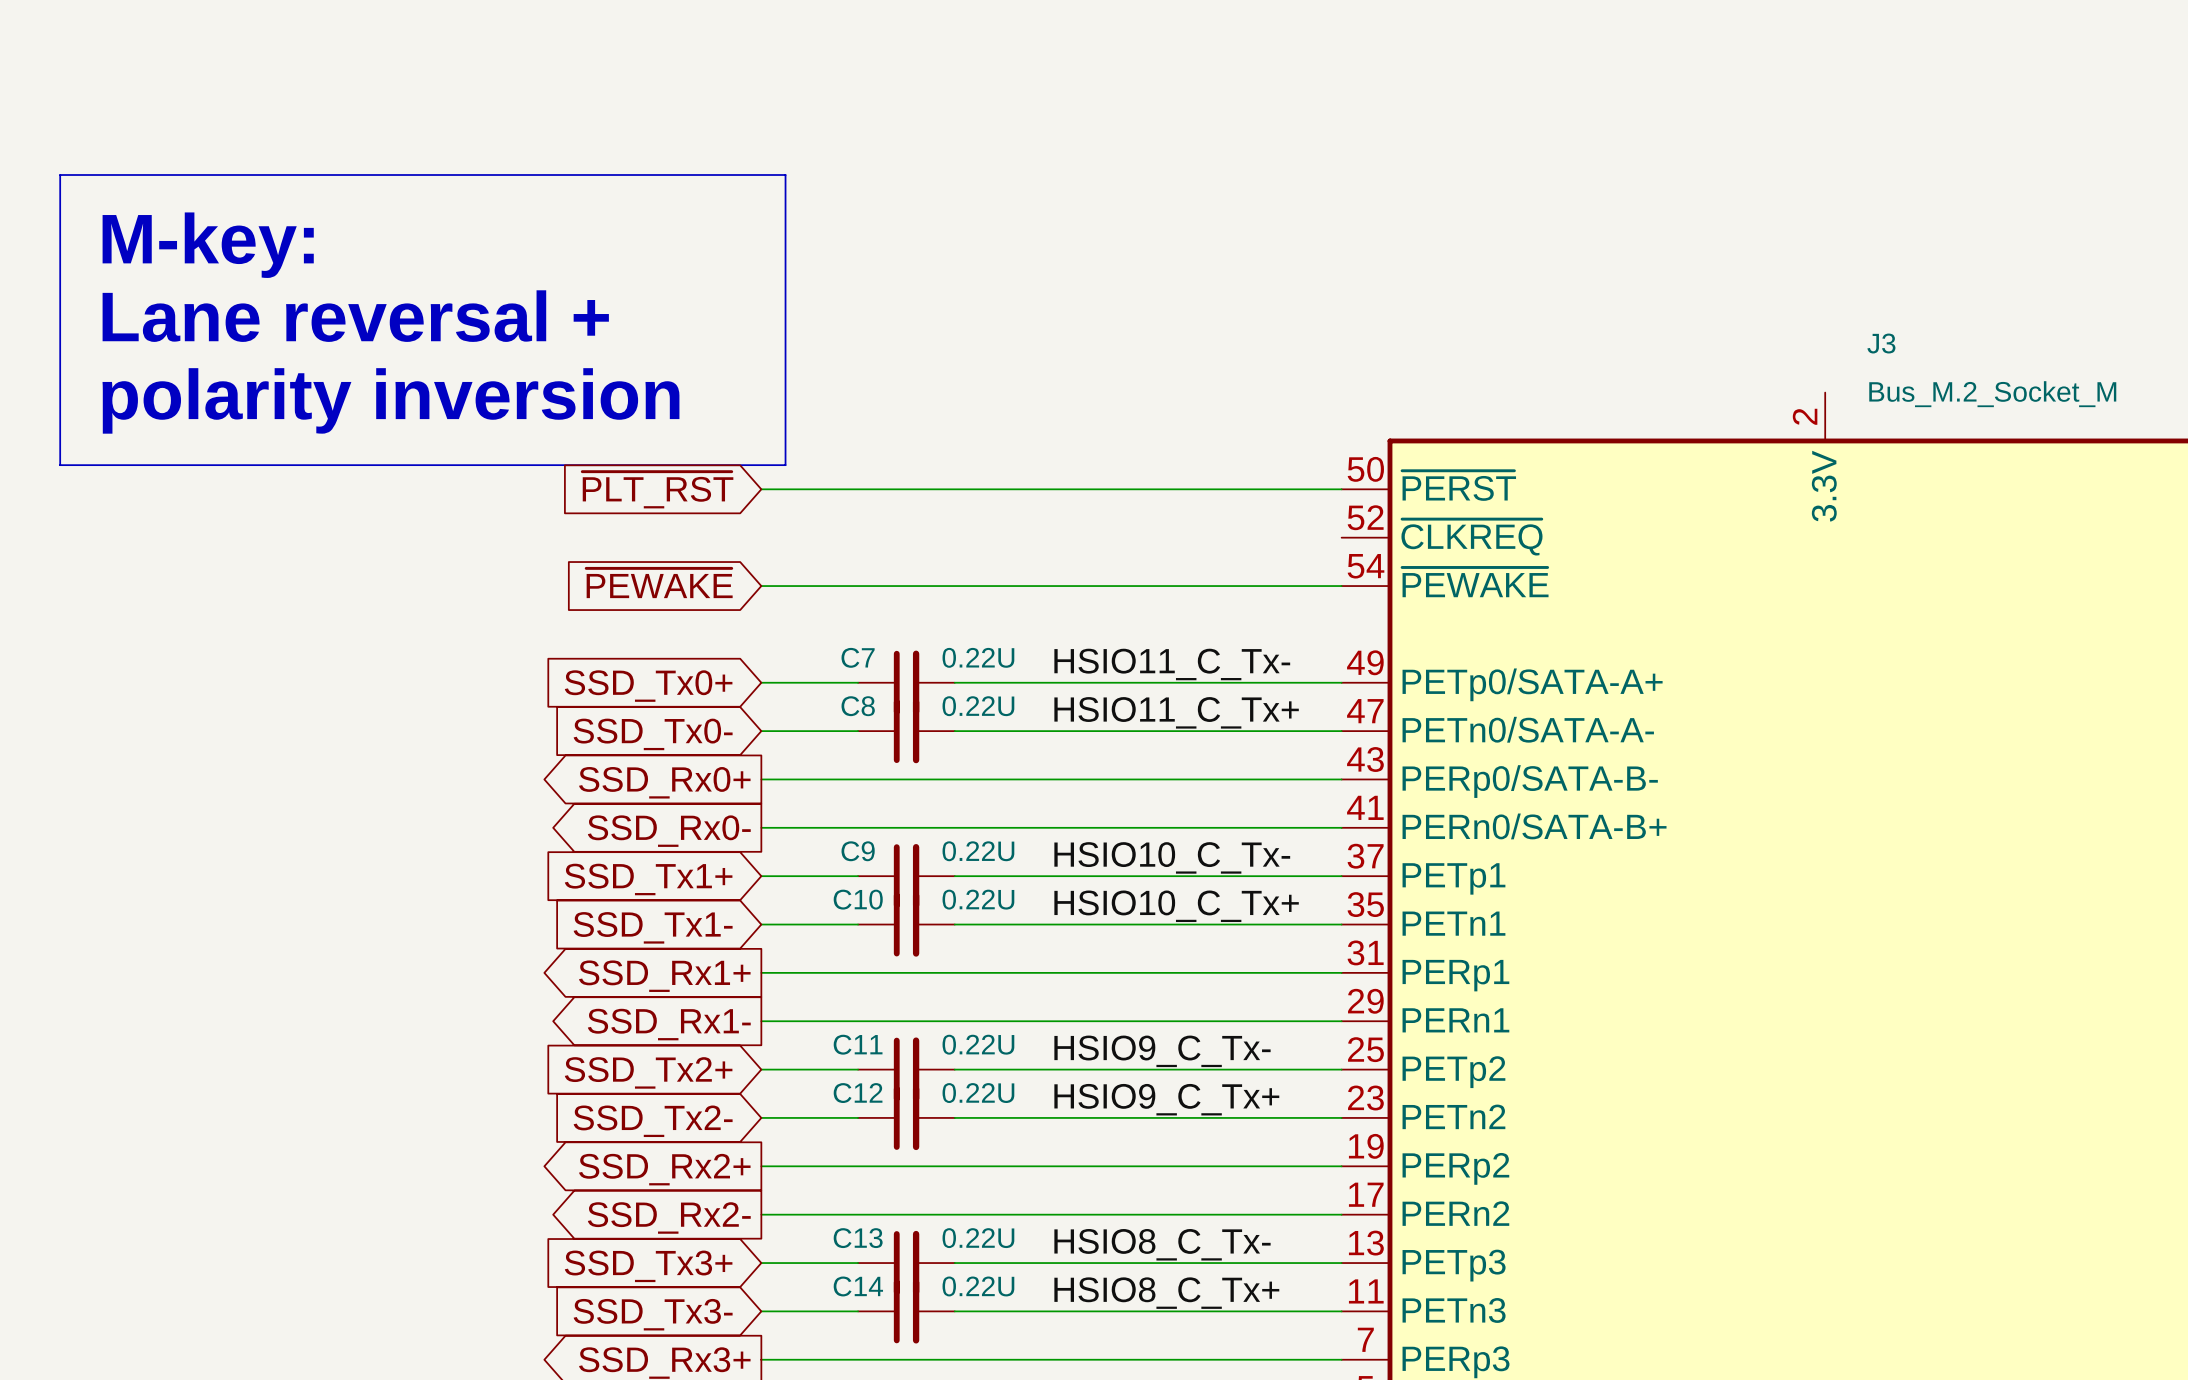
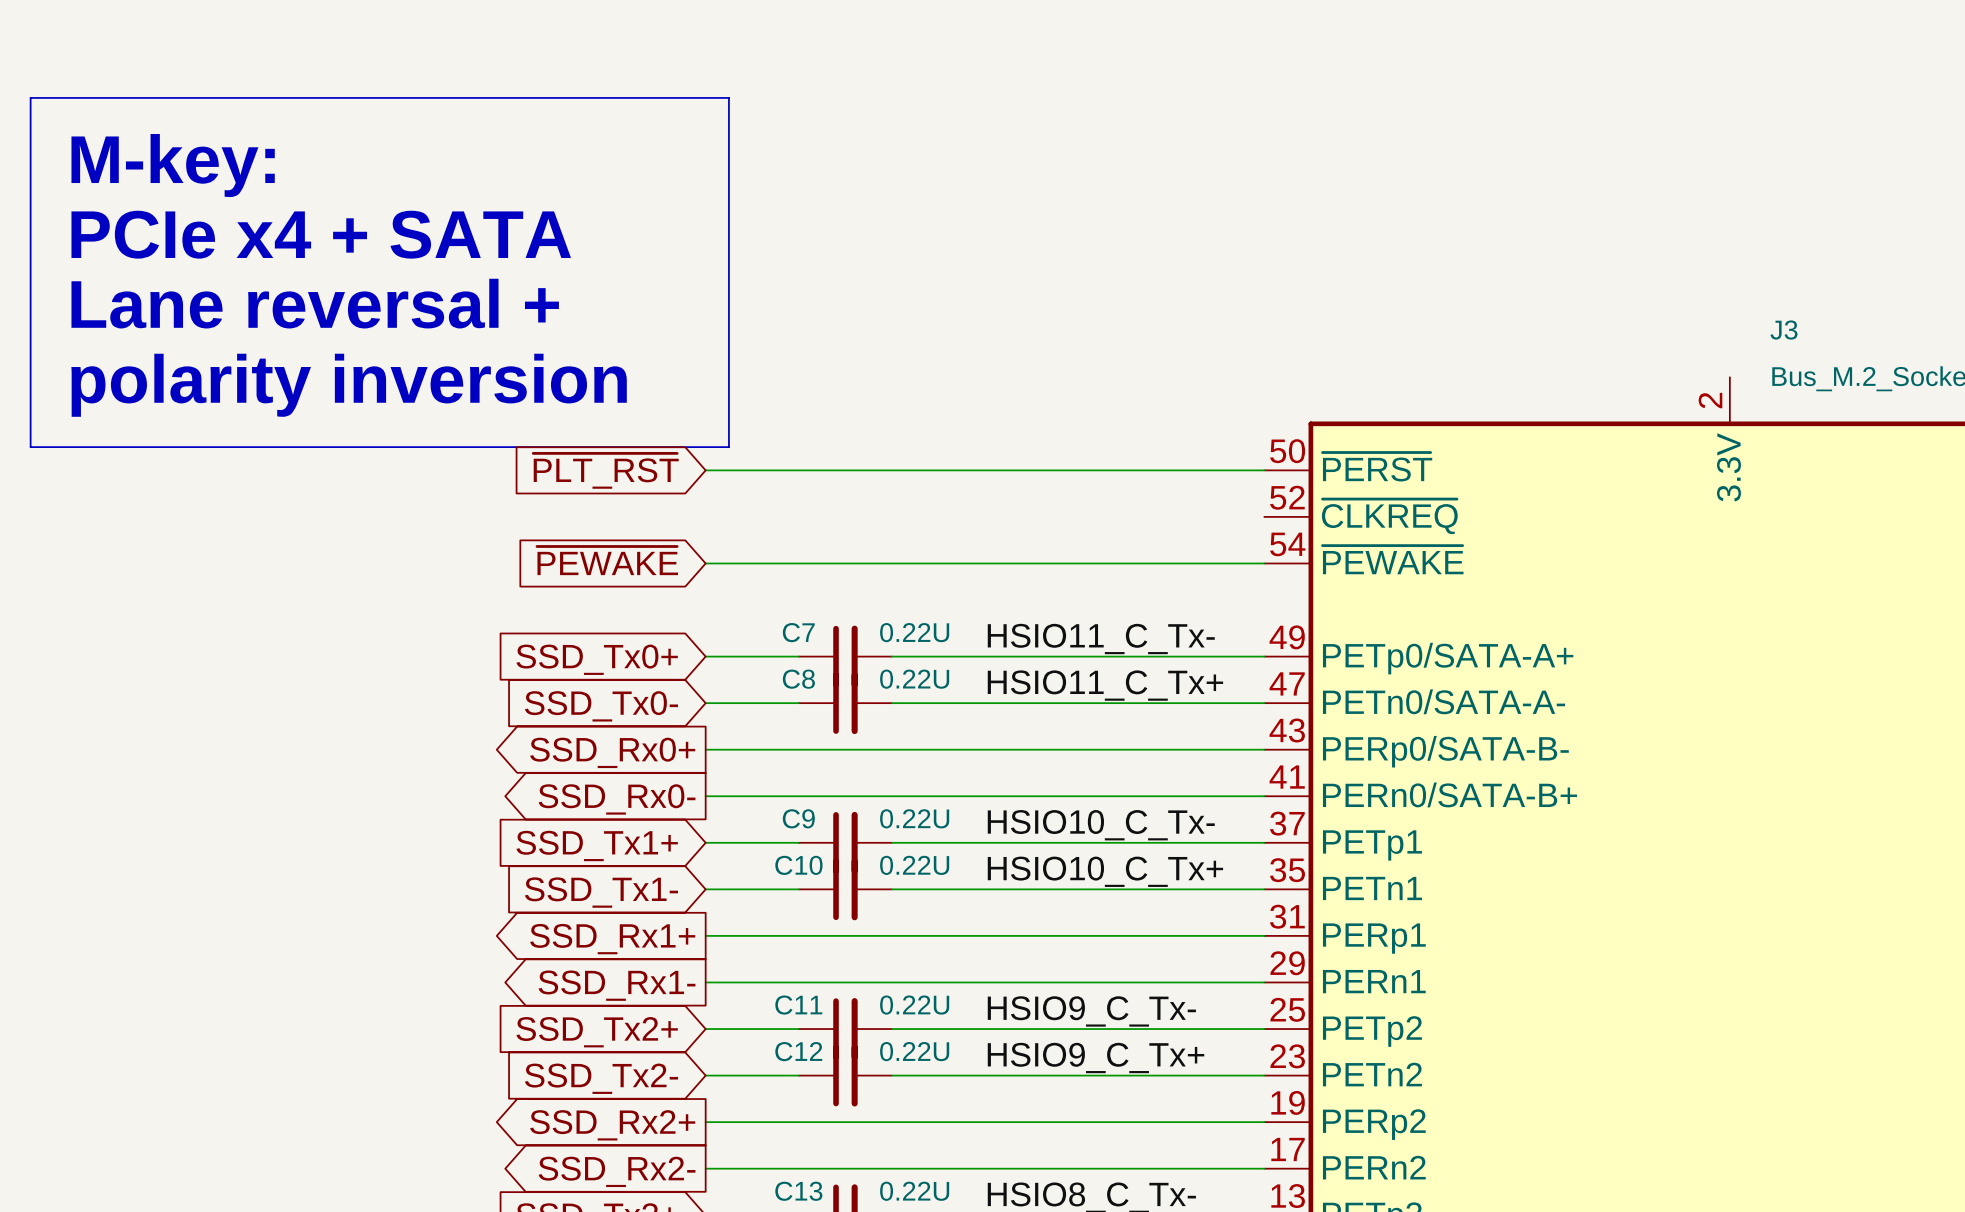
text: none -> M-key: (173, 165)
line: (60, 175) (785, 175) -> (30, 167) (30, 97) (728, 97) (728, 167)
text: M-key: (208, 245) -> PCIe x4 + SATA (321, 234)

